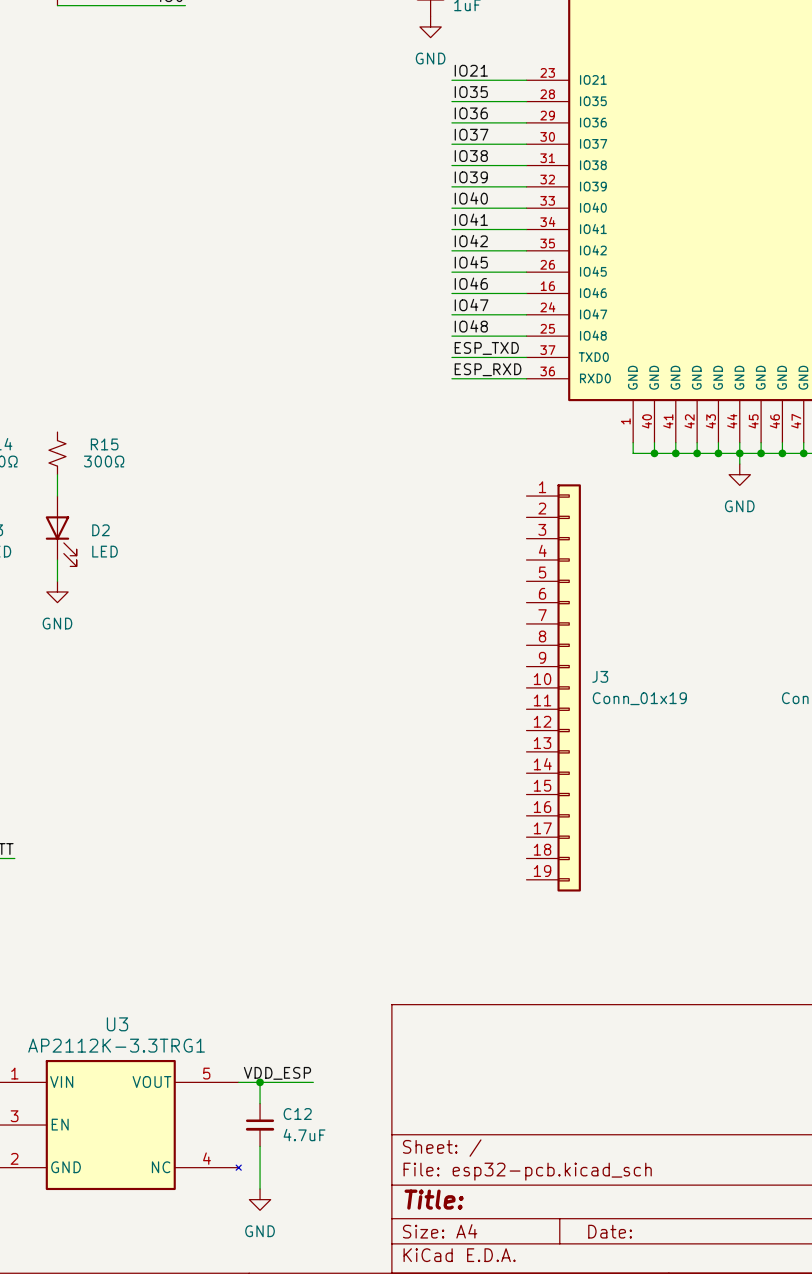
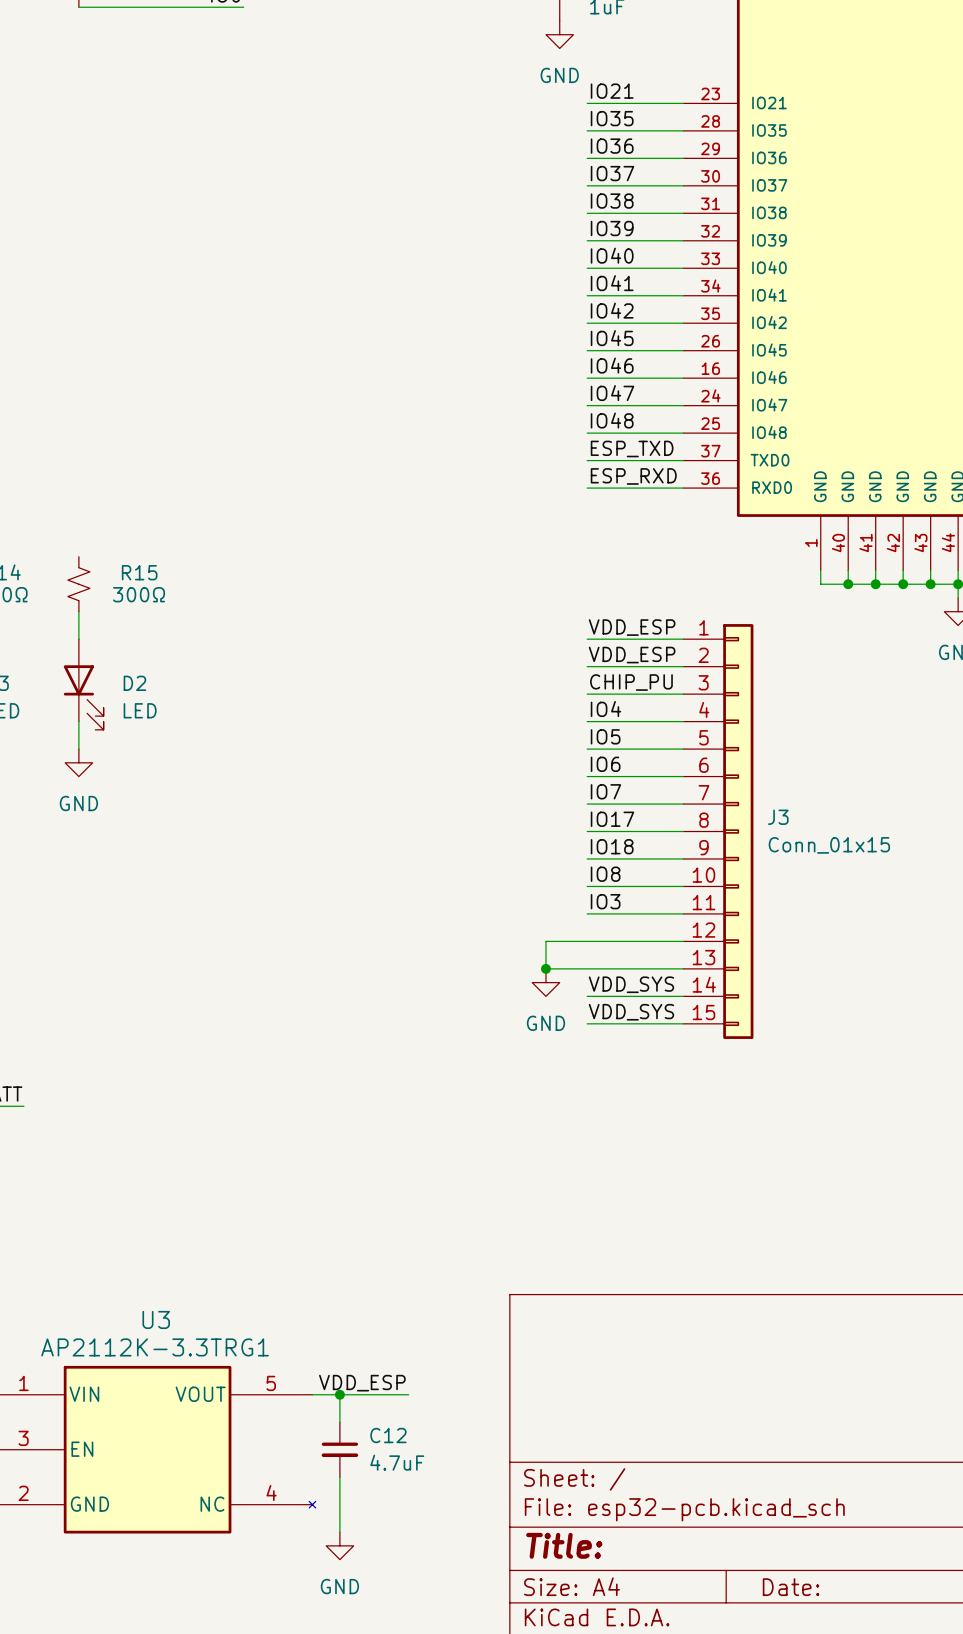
J3 symbol: [526, 484, 581, 892] -> [683, 624, 754, 1039]
label: none -> VDD_ESP (632, 627)
wire: none -> (587, 639) (683, 639)
label: none -> VDD_ESP (632, 655)
wire: none -> (587, 666) (683, 666)
label: none -> CHIP_PU (631, 682)
wire: none -> (587, 694) (683, 694)
label: none -> IO4 (605, 709)
wire: none -> (587, 721) (683, 721)
label: none -> IO5 (605, 736)
wire: none -> (587, 749) (683, 749)
label: none -> IO6 (605, 764)
wire: none -> (587, 776) (683, 776)
label: none -> IO7 (605, 791)
wire: none -> (587, 804) (683, 804)
label: none -> IO17 (612, 819)
wire: none -> (587, 831) (683, 831)
label: none -> IO18 (612, 846)
wire: none -> (587, 858) (683, 858)
label: none -> IO8 (605, 874)
wire: none -> (587, 886) (683, 886)
J3 value: Conn_01x19 (639, 698) -> Conn_01x15 (829, 845)
label: none -> IO3 (605, 901)
wire: none -> (587, 913) (683, 913)
wire: none -> (683, 941) (545, 941) (545, 968) (683, 968)
junction: none -> (545, 968)
power symbol: none -> GND (545, 982)
label: none -> VDD_SYS (631, 984)
wire: none -> (587, 996) (683, 996)
label: none -> VDD_SYS (631, 1012)
wire: none -> (587, 1023) (683, 1023)

